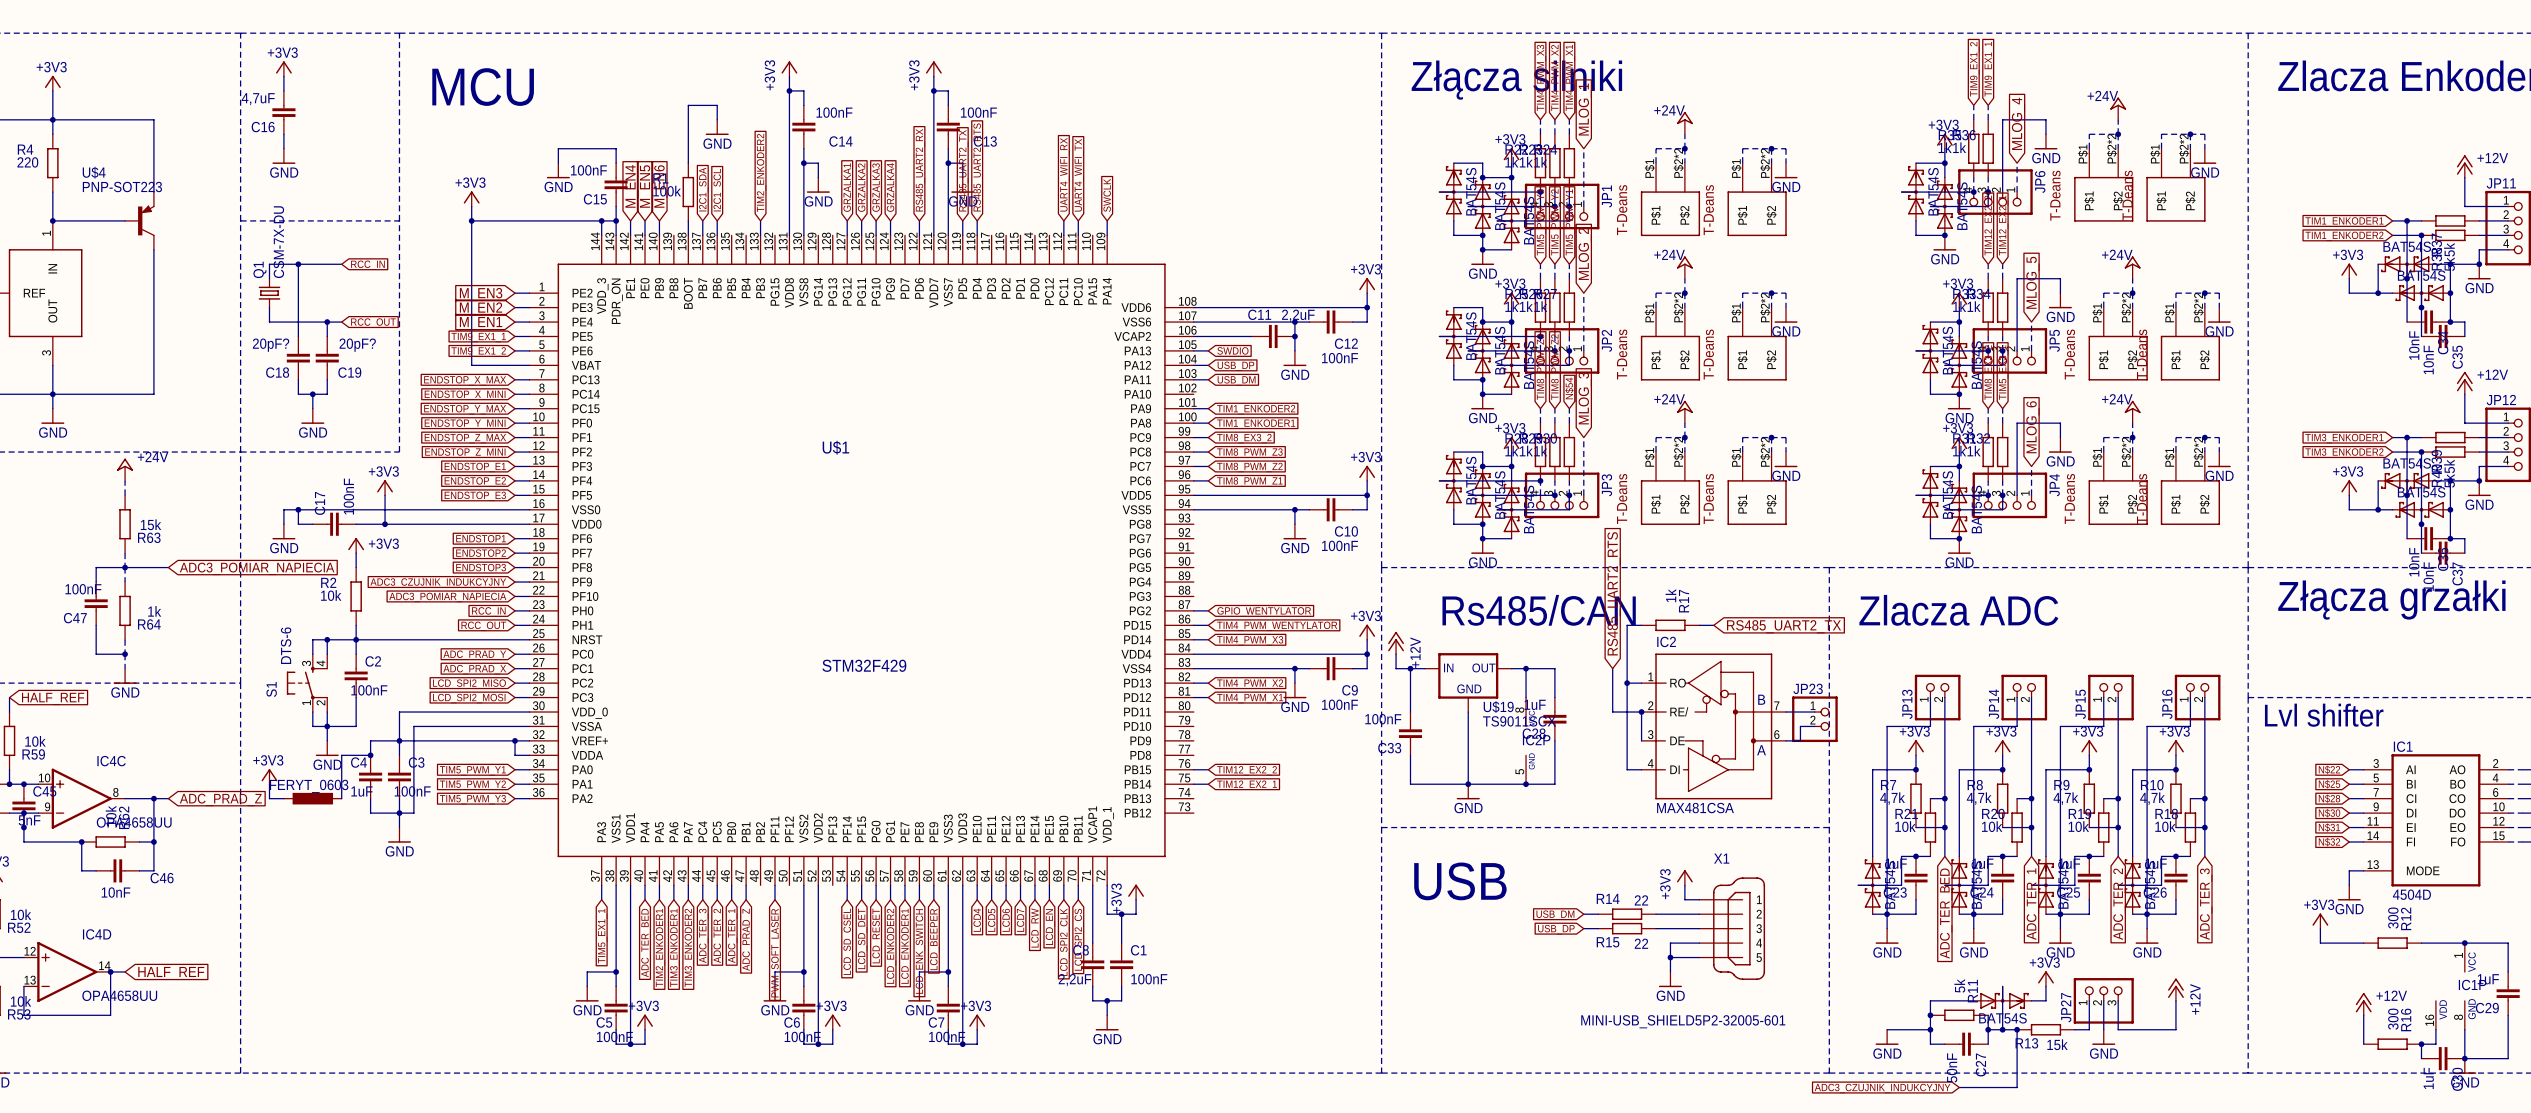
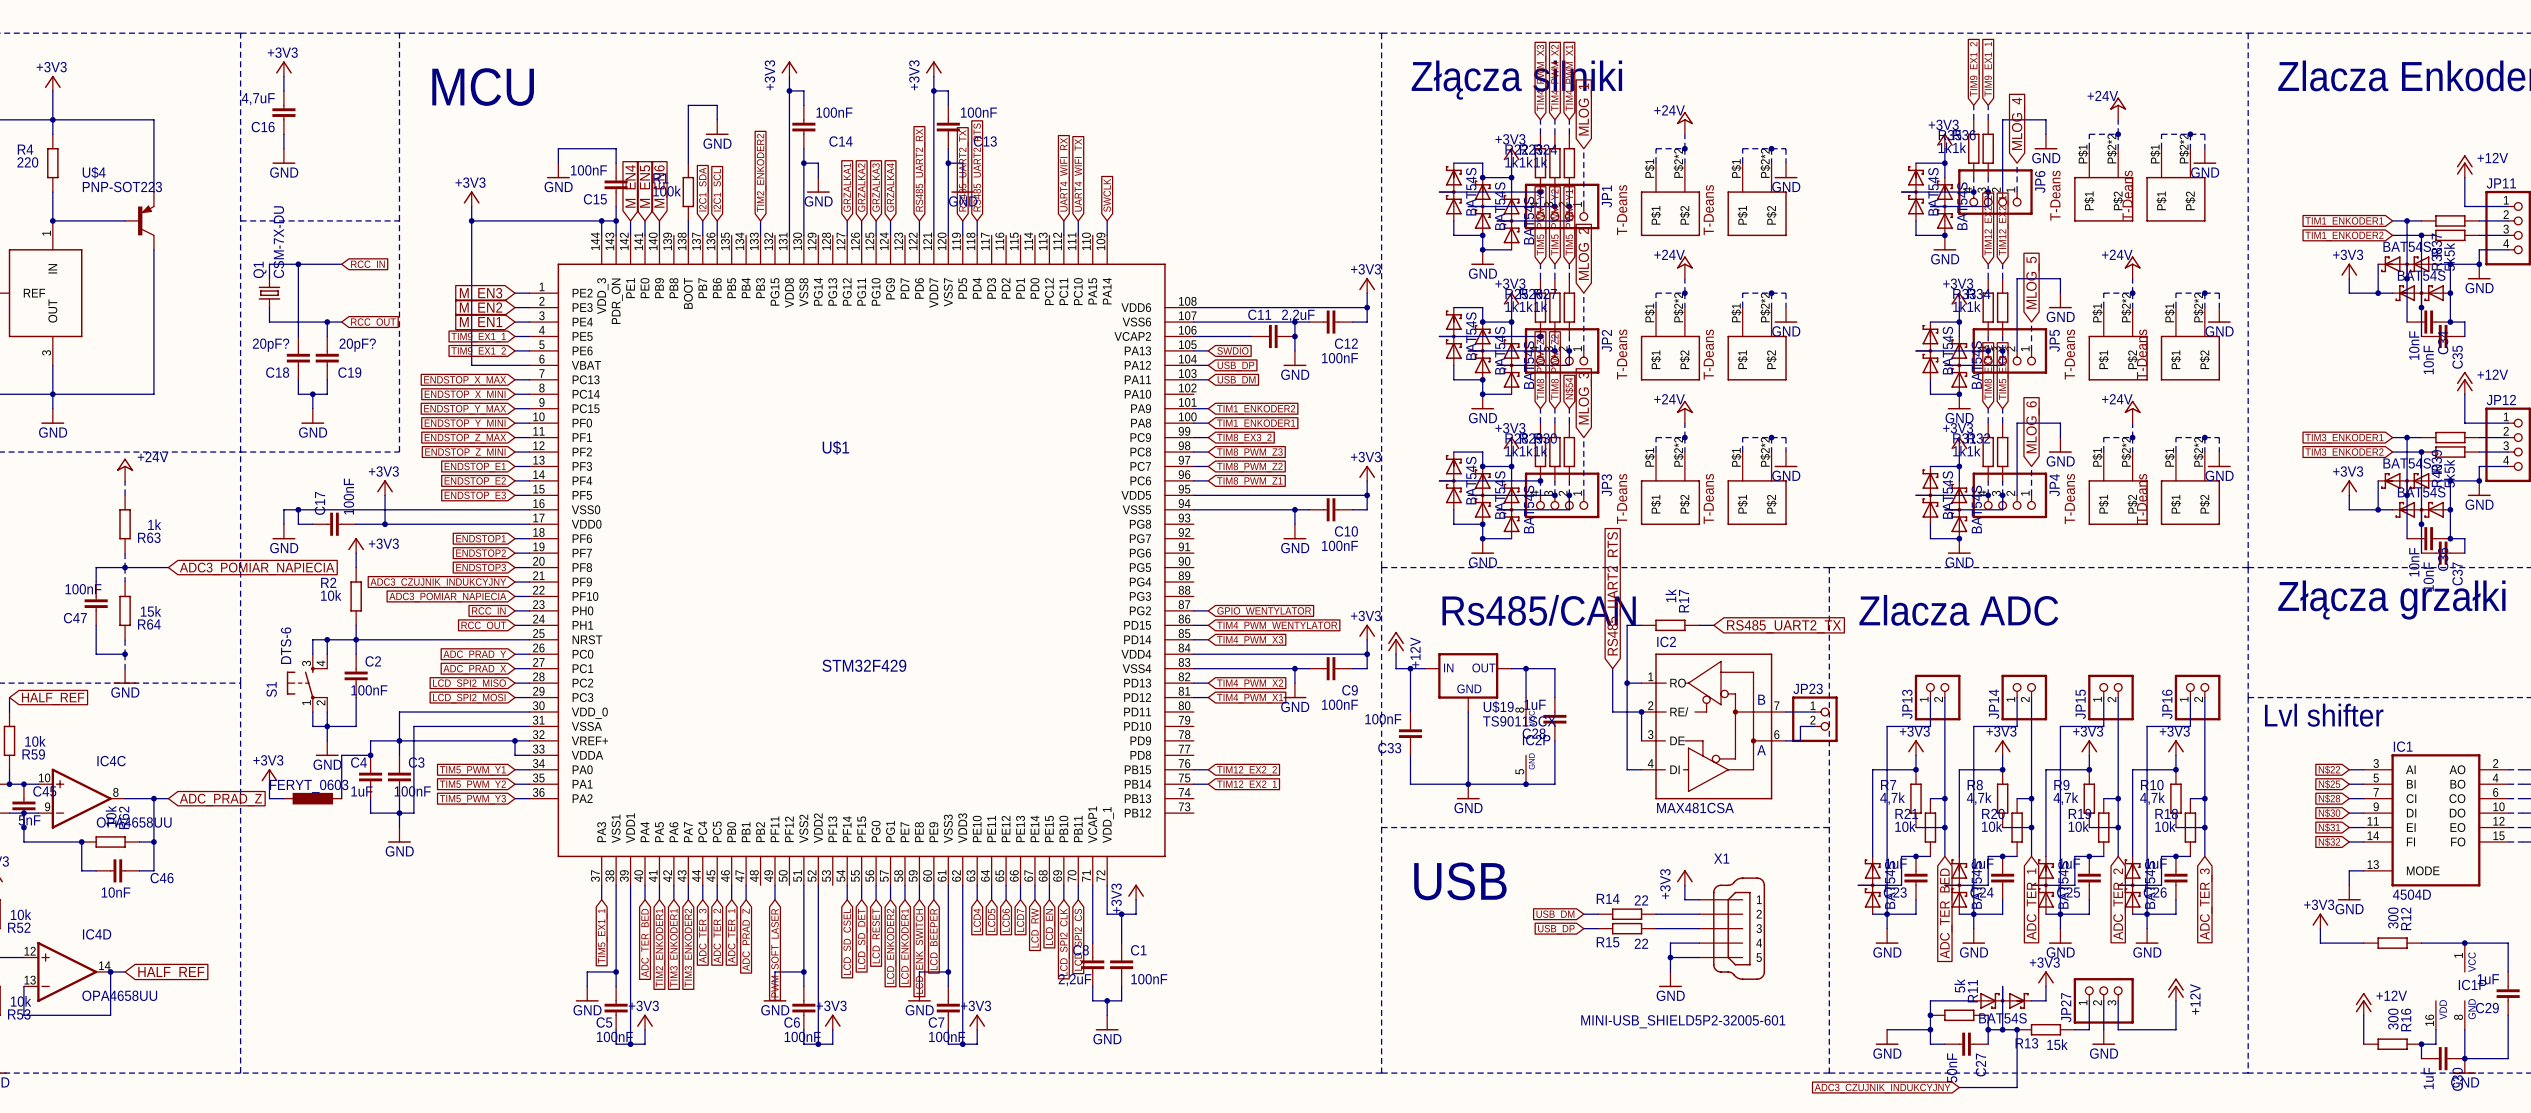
R63 value: 15k (151, 524) -> 1k (154, 524)
R64 value: 1k (154, 611) -> 15k (151, 611)

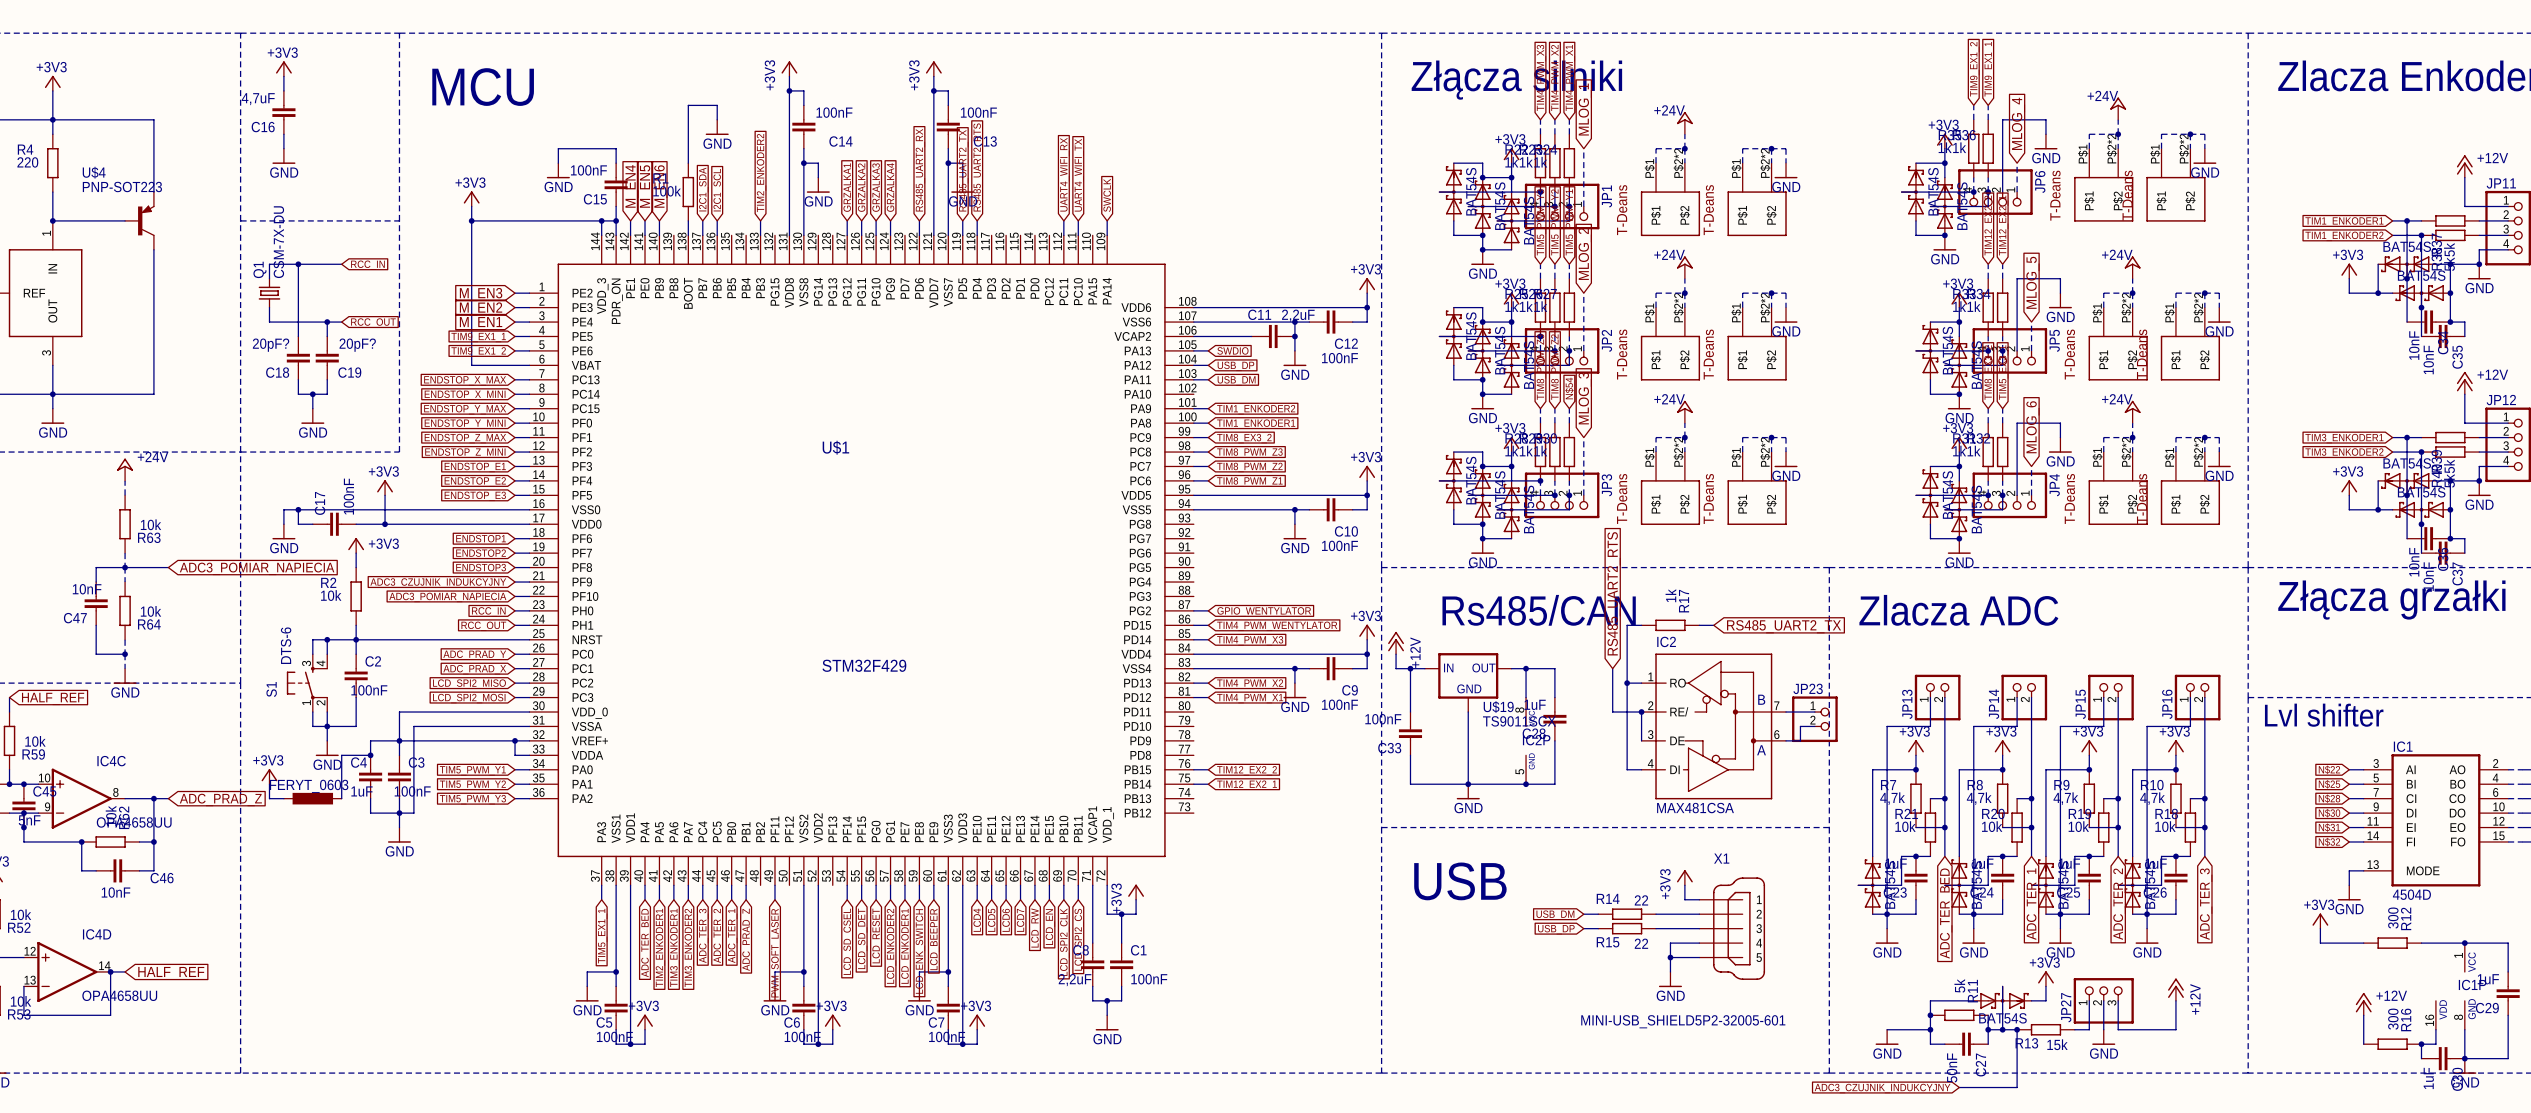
R63 value: 1k (154, 524) -> 10k (151, 524)
C47 value: 100nF (83, 589) -> 10nF (87, 589)
R64 value: 15k (151, 611) -> 10k (151, 611)

